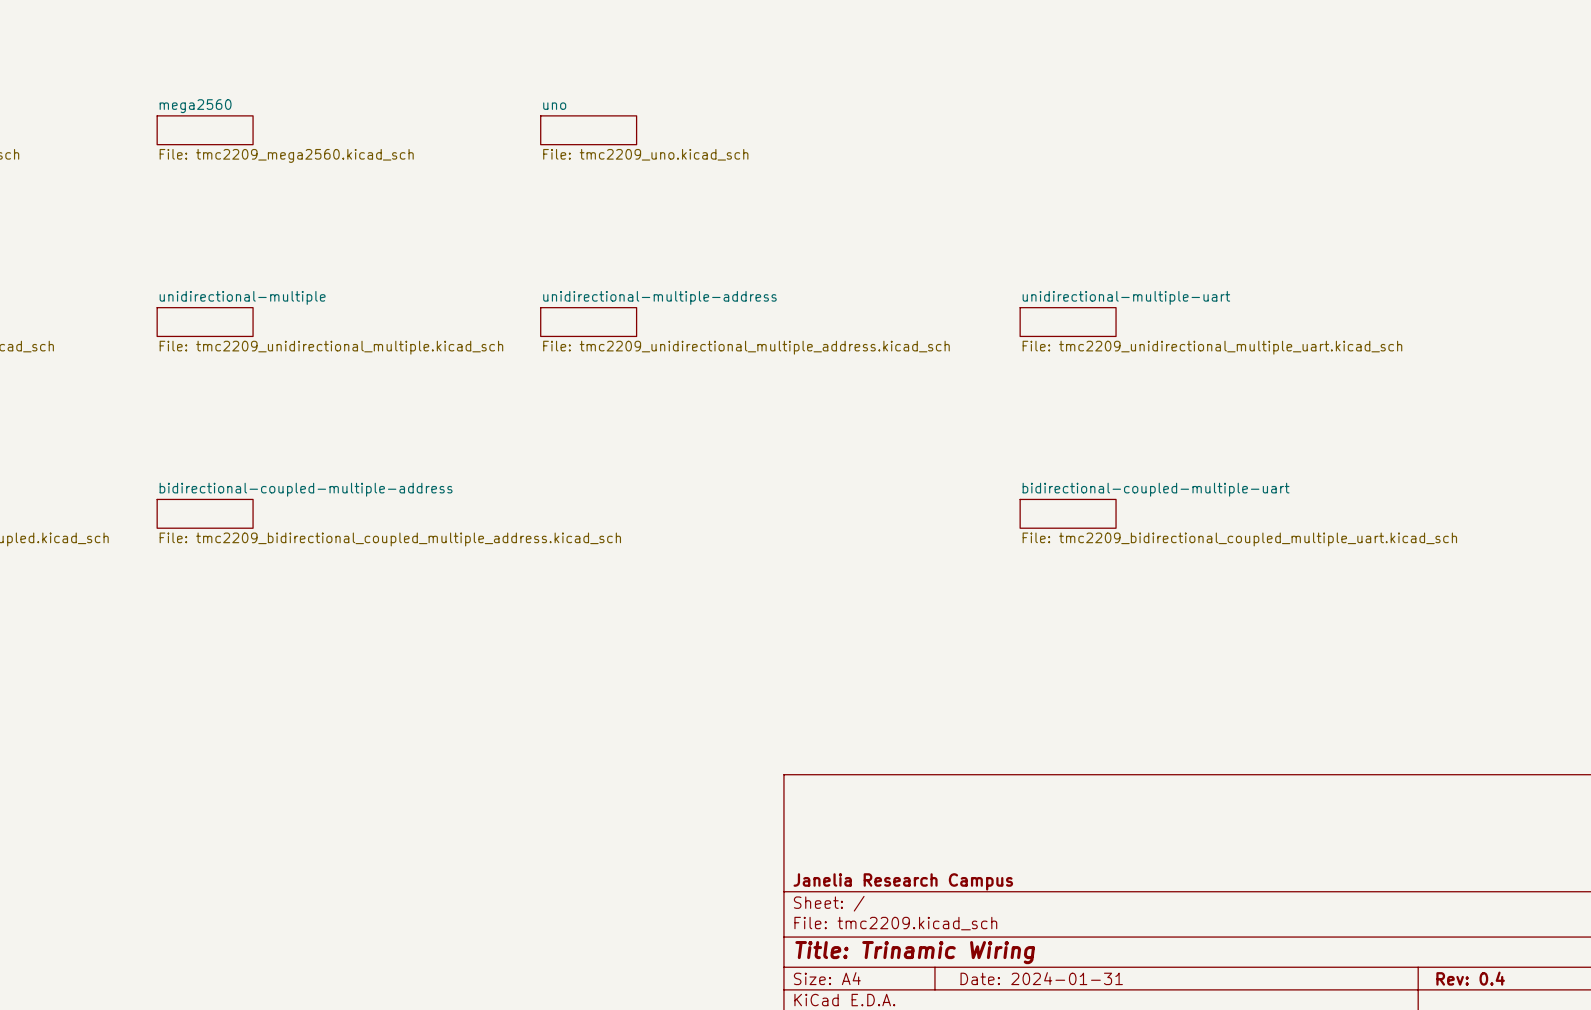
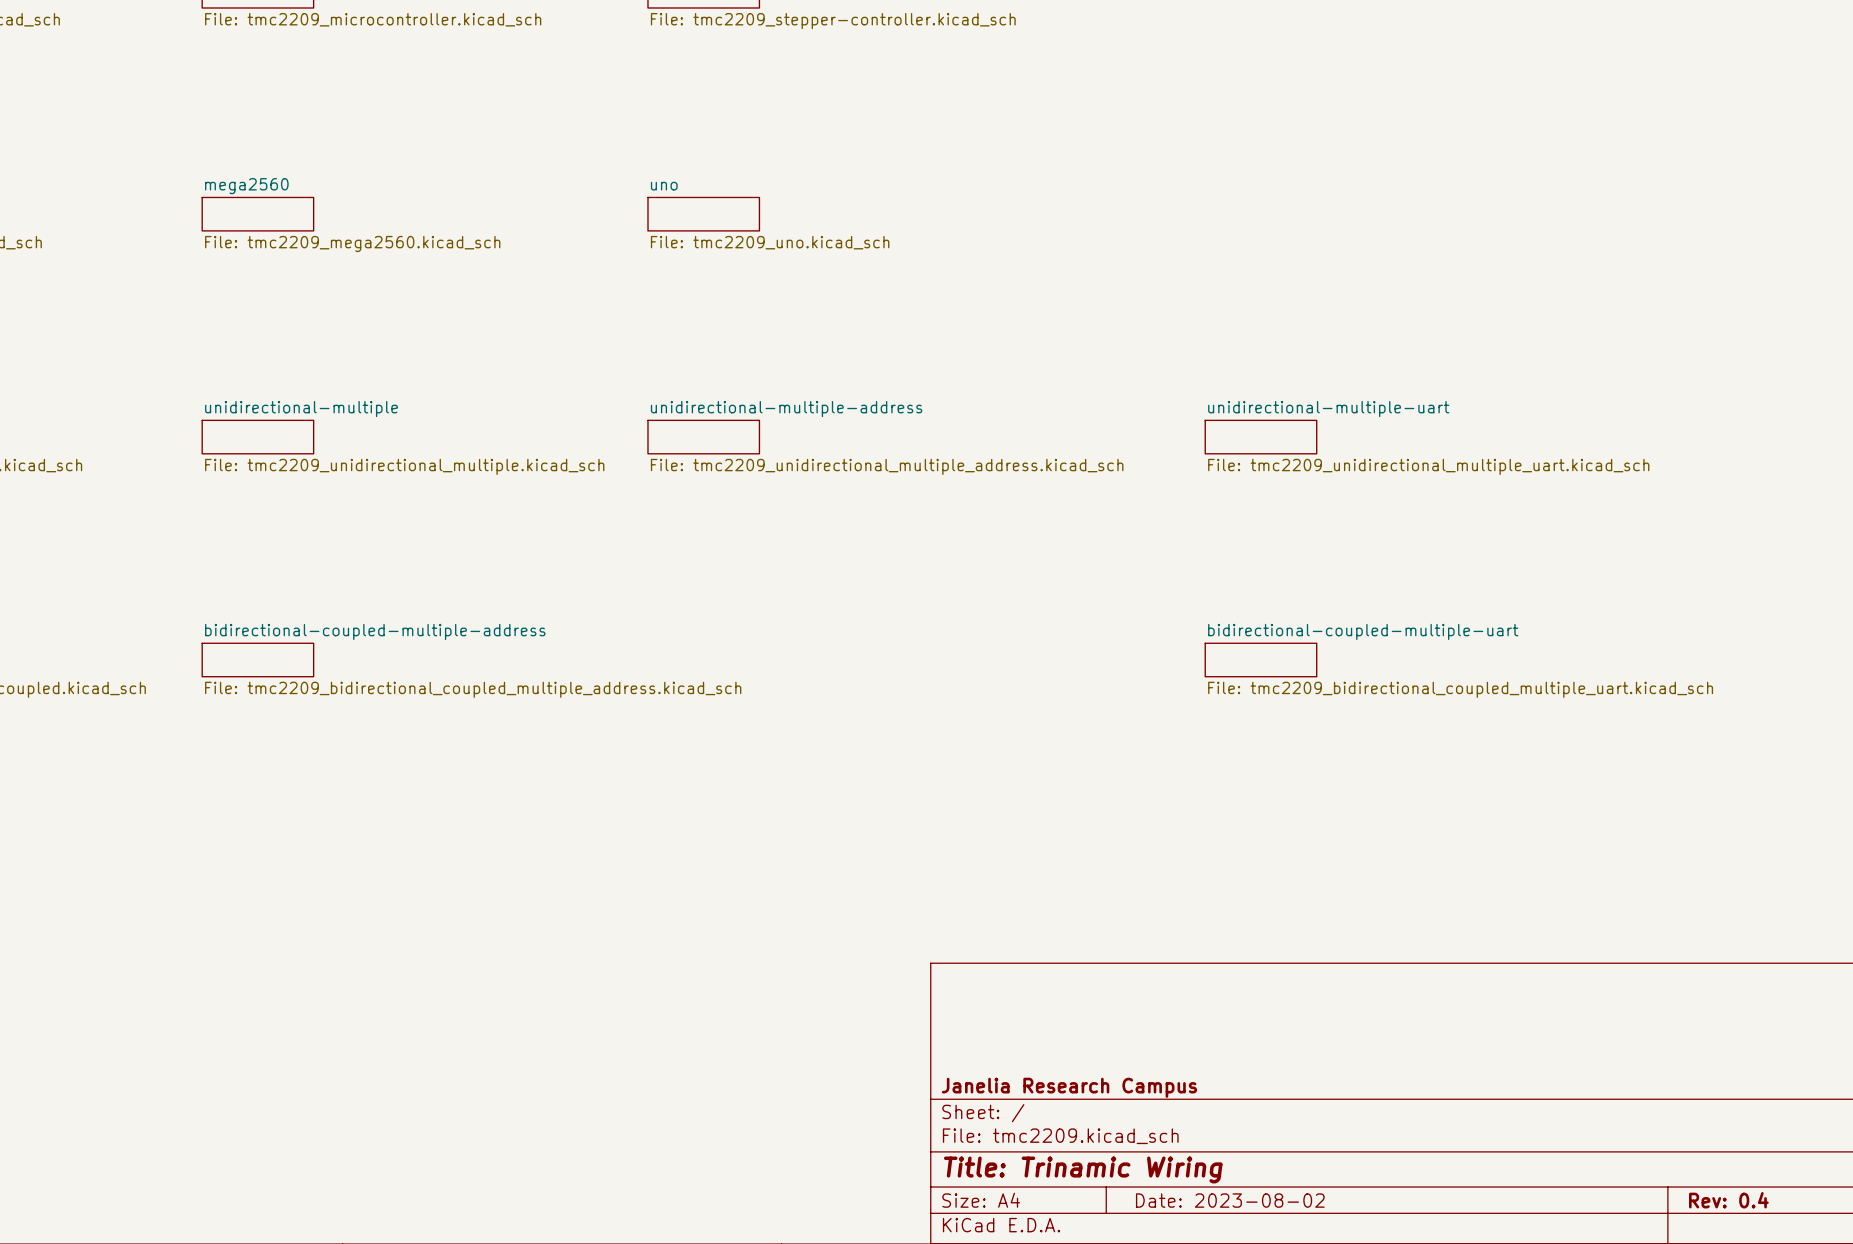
title block: Date: 2024-01-31 (1041, 978) -> Date: 2023-08-02 (1230, 1200)

